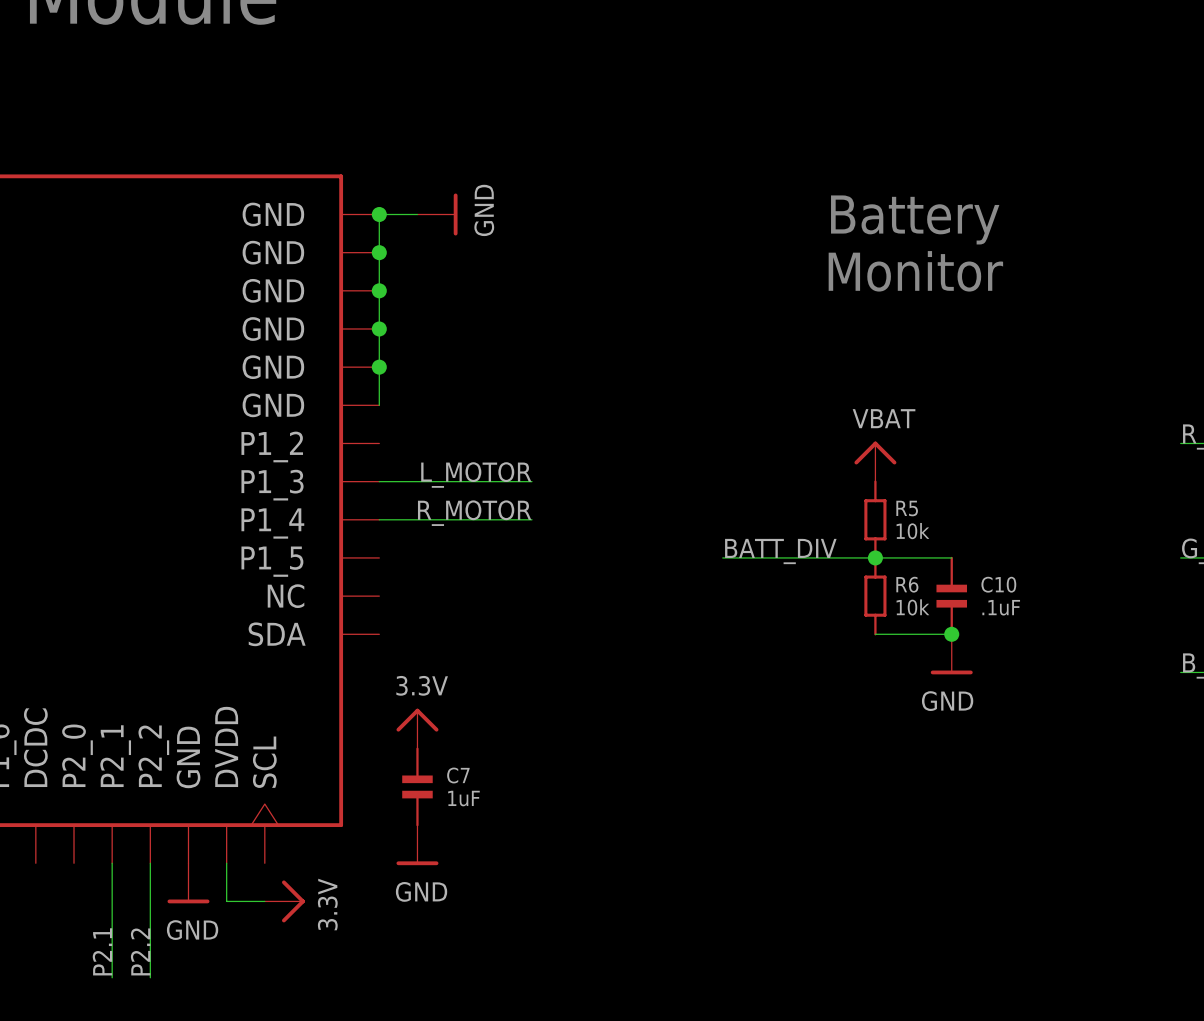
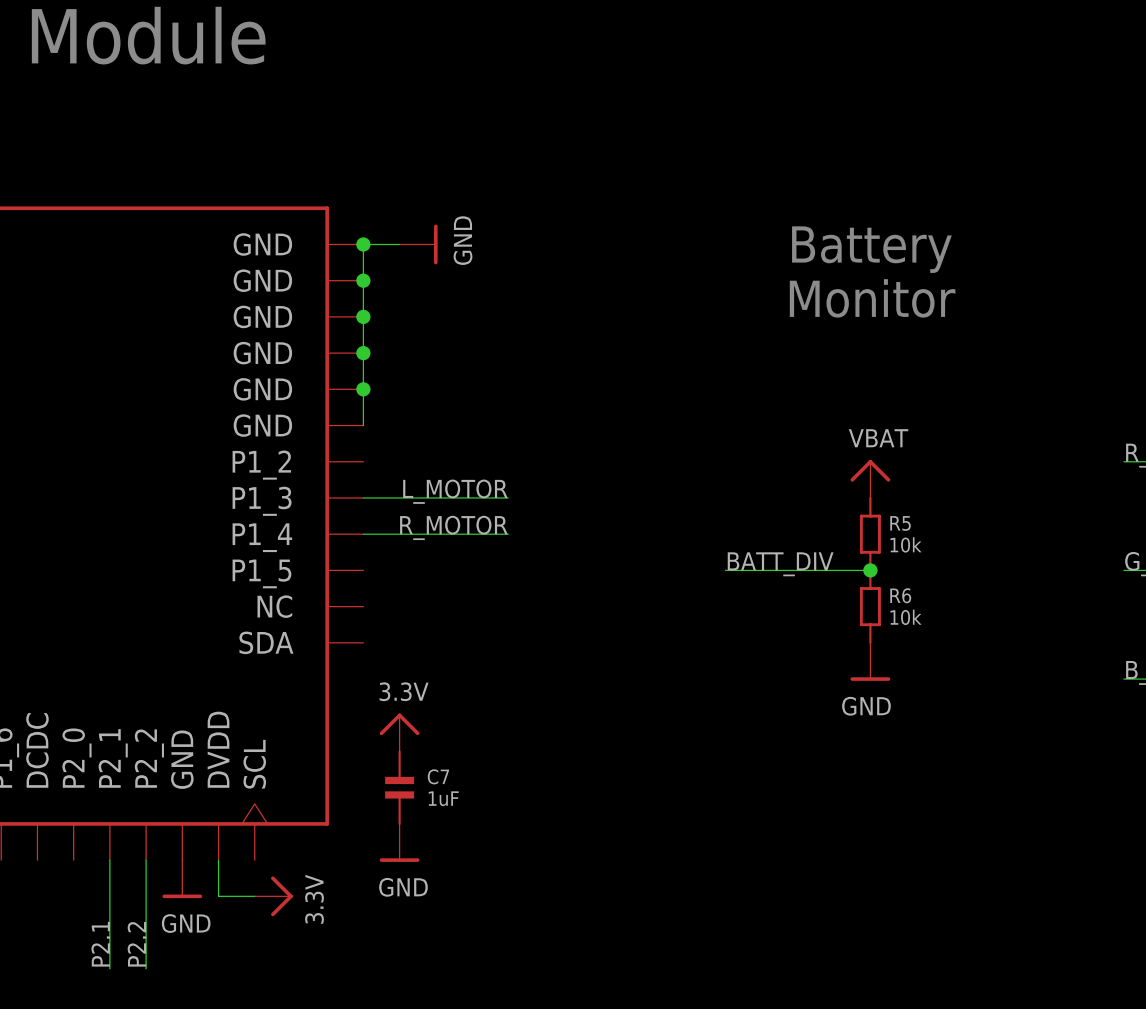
power symbol position: VBAT (875, 461) -> VBAT (870, 478)
R5 position: (875, 519) -> (870, 534)
label position: BATT_DIV (780, 551) -> BATT_DIV (780, 564)
wire: (722, 557) (760, 557) -> none
junction position: (875, 557) -> (870, 570)
wire: (913, 557) (951, 557) -> none
R6 position: (875, 596) -> (870, 606)
C10: .1uF (951, 596) -> none
wire: (875, 634) (951, 634) -> none
junction: (951, 634) -> none
power symbol position: GND (951, 654) -> GND (870, 661)

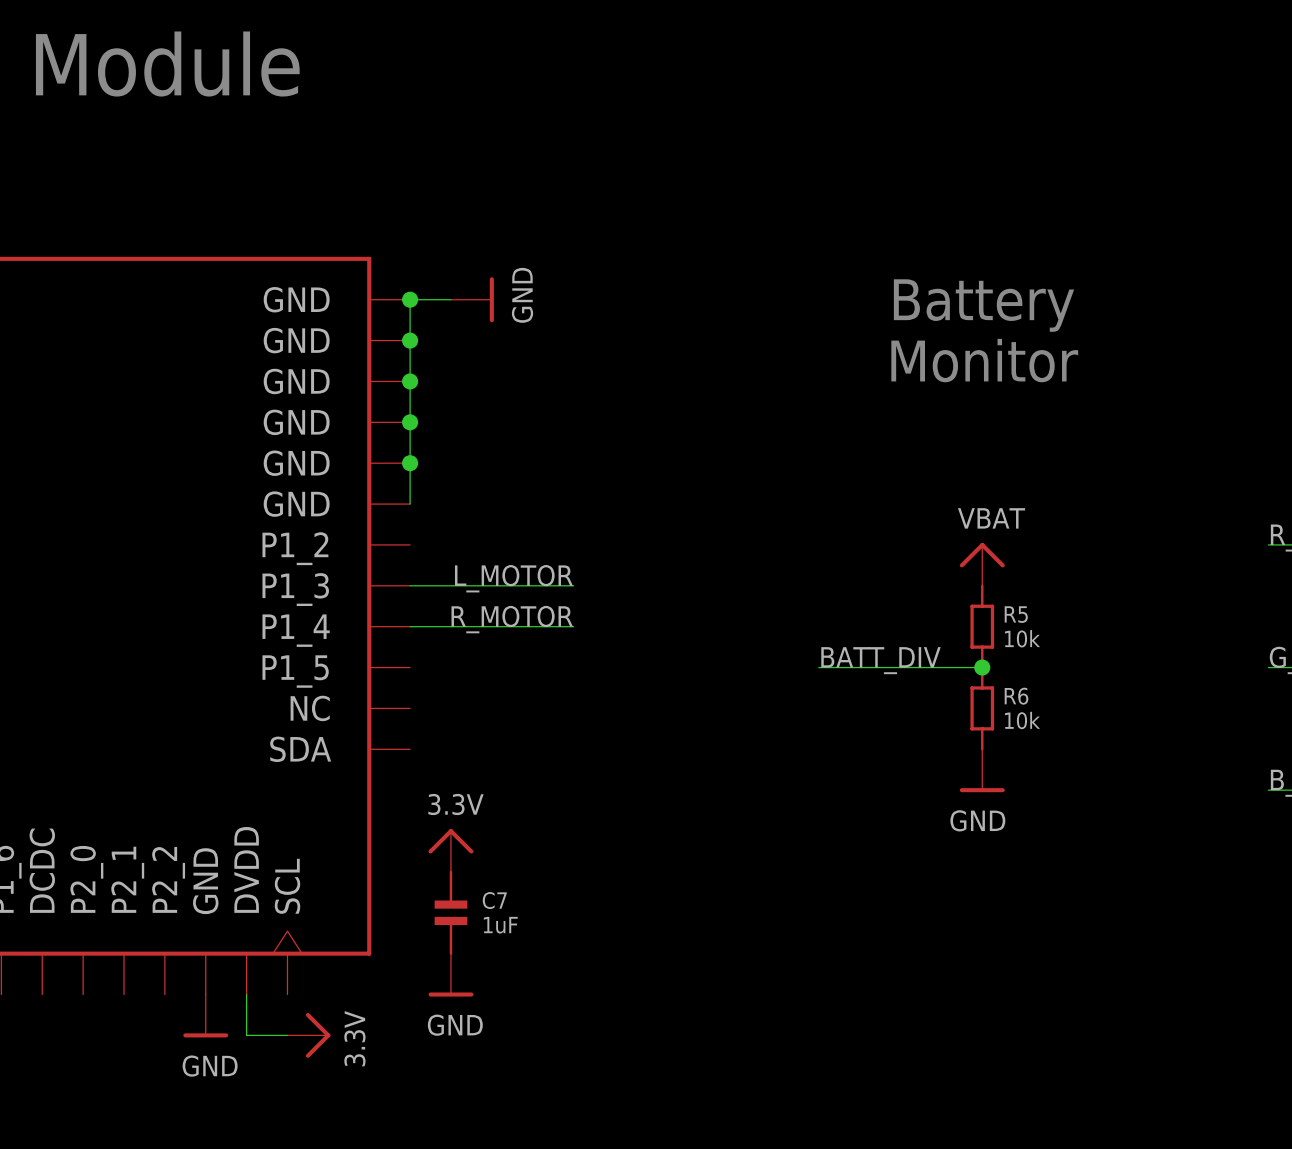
wire: (109, 860) (109, 968) -> none
wire: (146, 860) (146, 968) -> none
label: P2.1 (100, 944) -> none
label: P2.2 (136, 944) -> none

